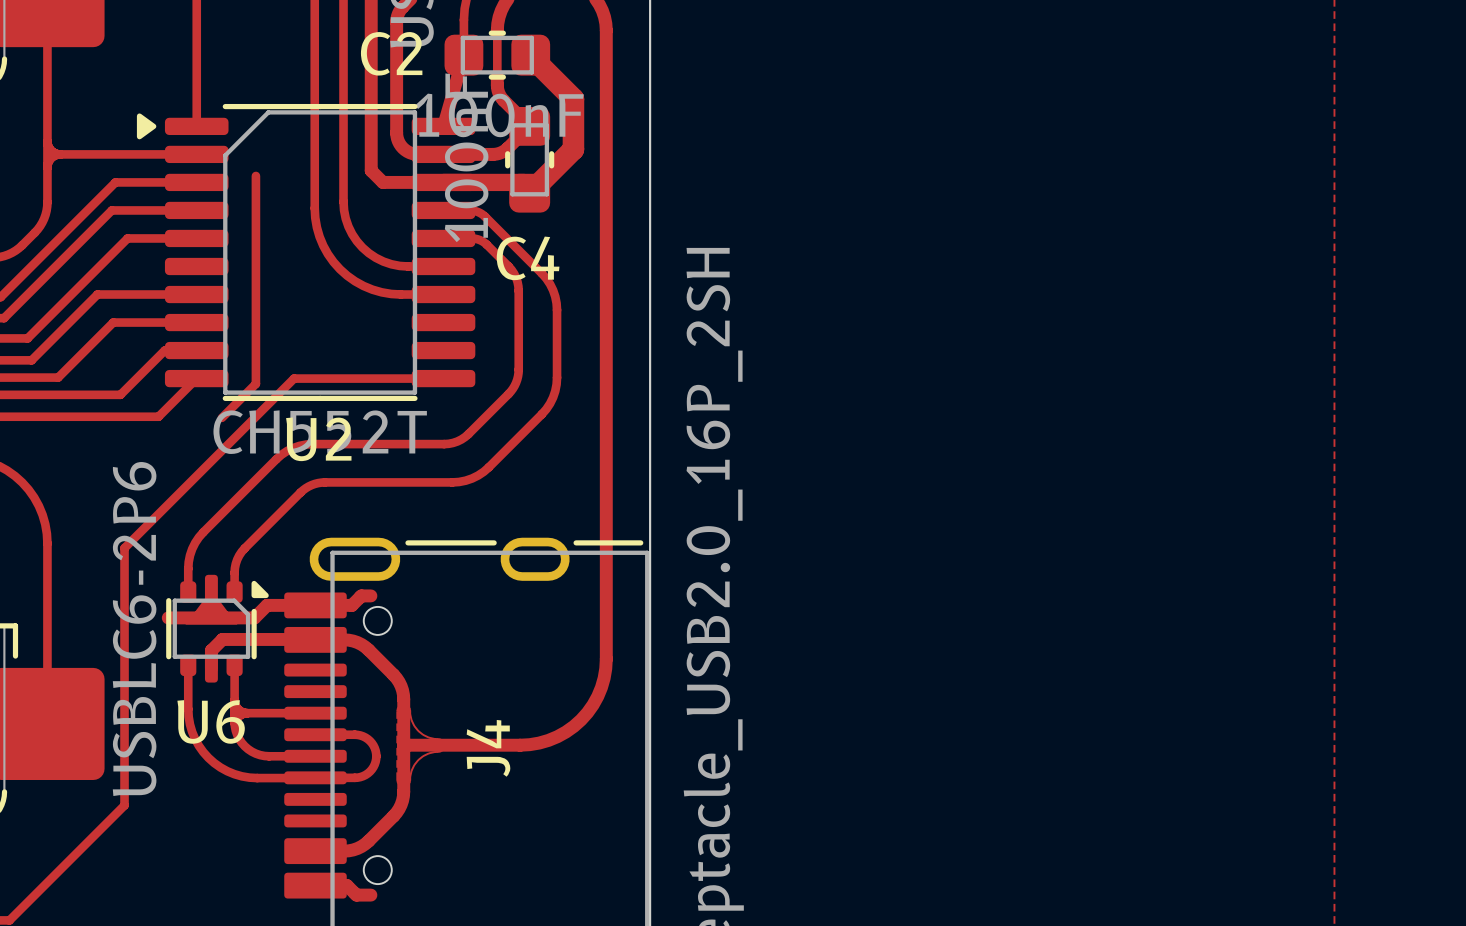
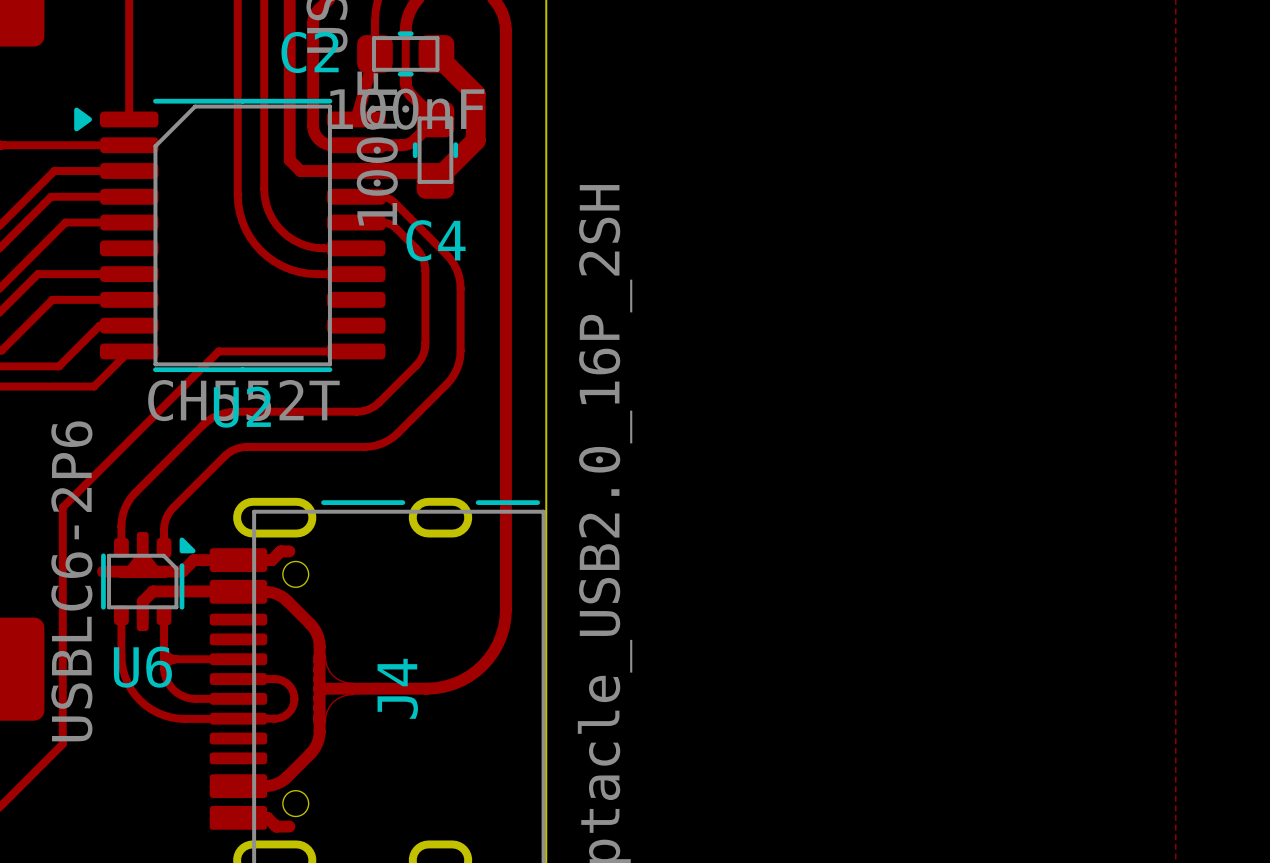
track: (255, 175) (255, 383) (221, 417) -> none

